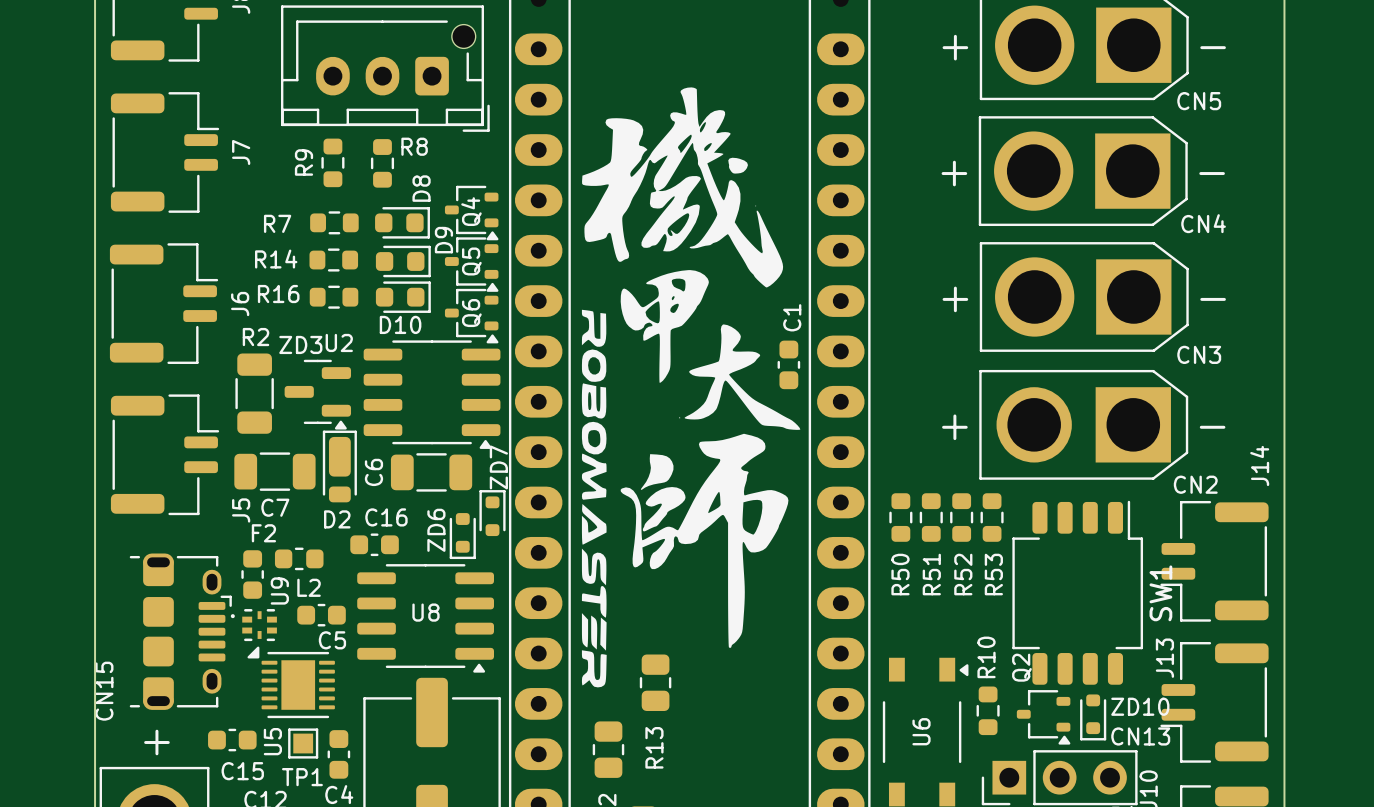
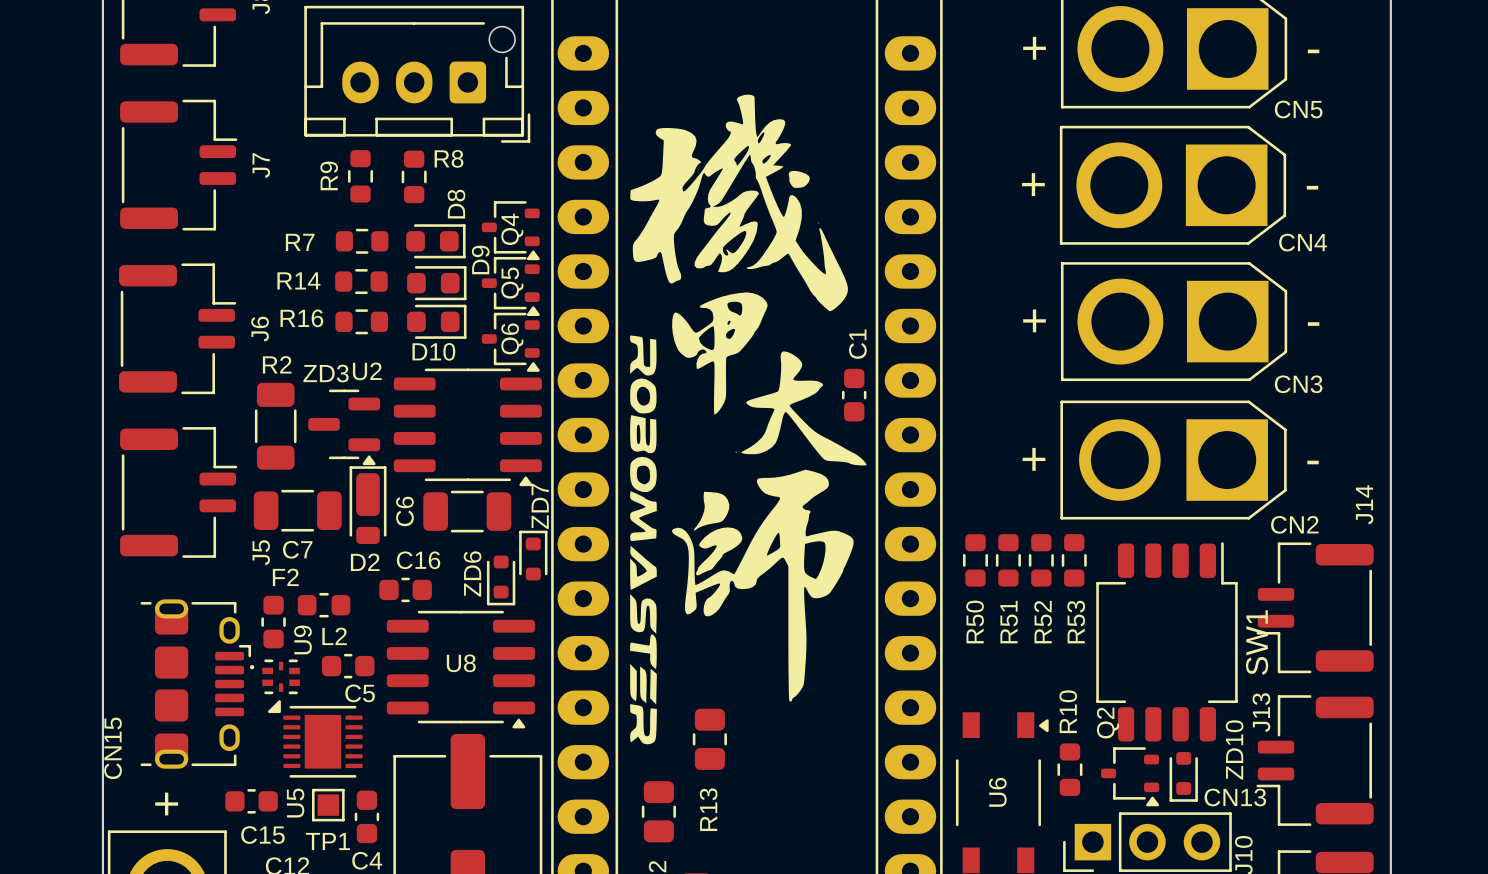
ZD10 name rotation: 0° (1140, 706) -> 90° counterclockwise (1234, 749)

